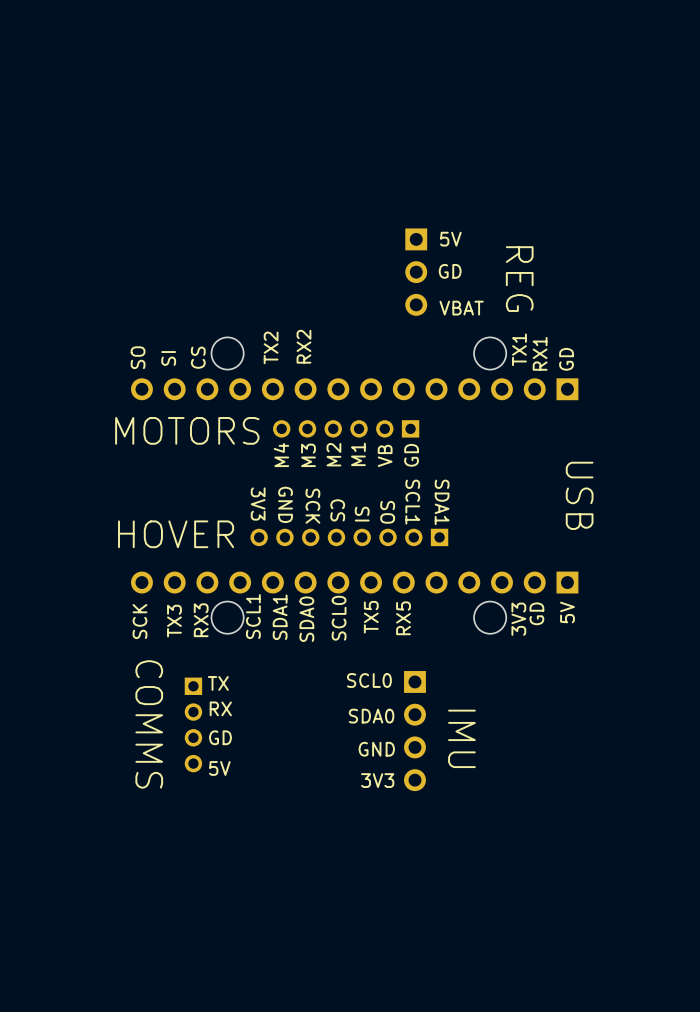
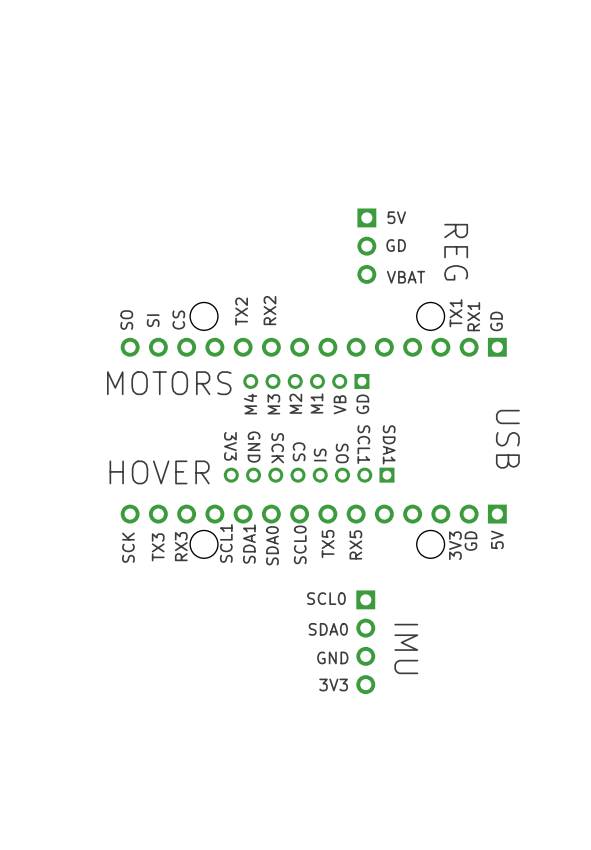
text: TX (218, 683) -> none
text: RX (220, 708) -> none
text: COMMS (149, 724) -> none
part: (193, 724) -> none
text: GD (220, 737) -> none
text: 5V (219, 768) -> none

